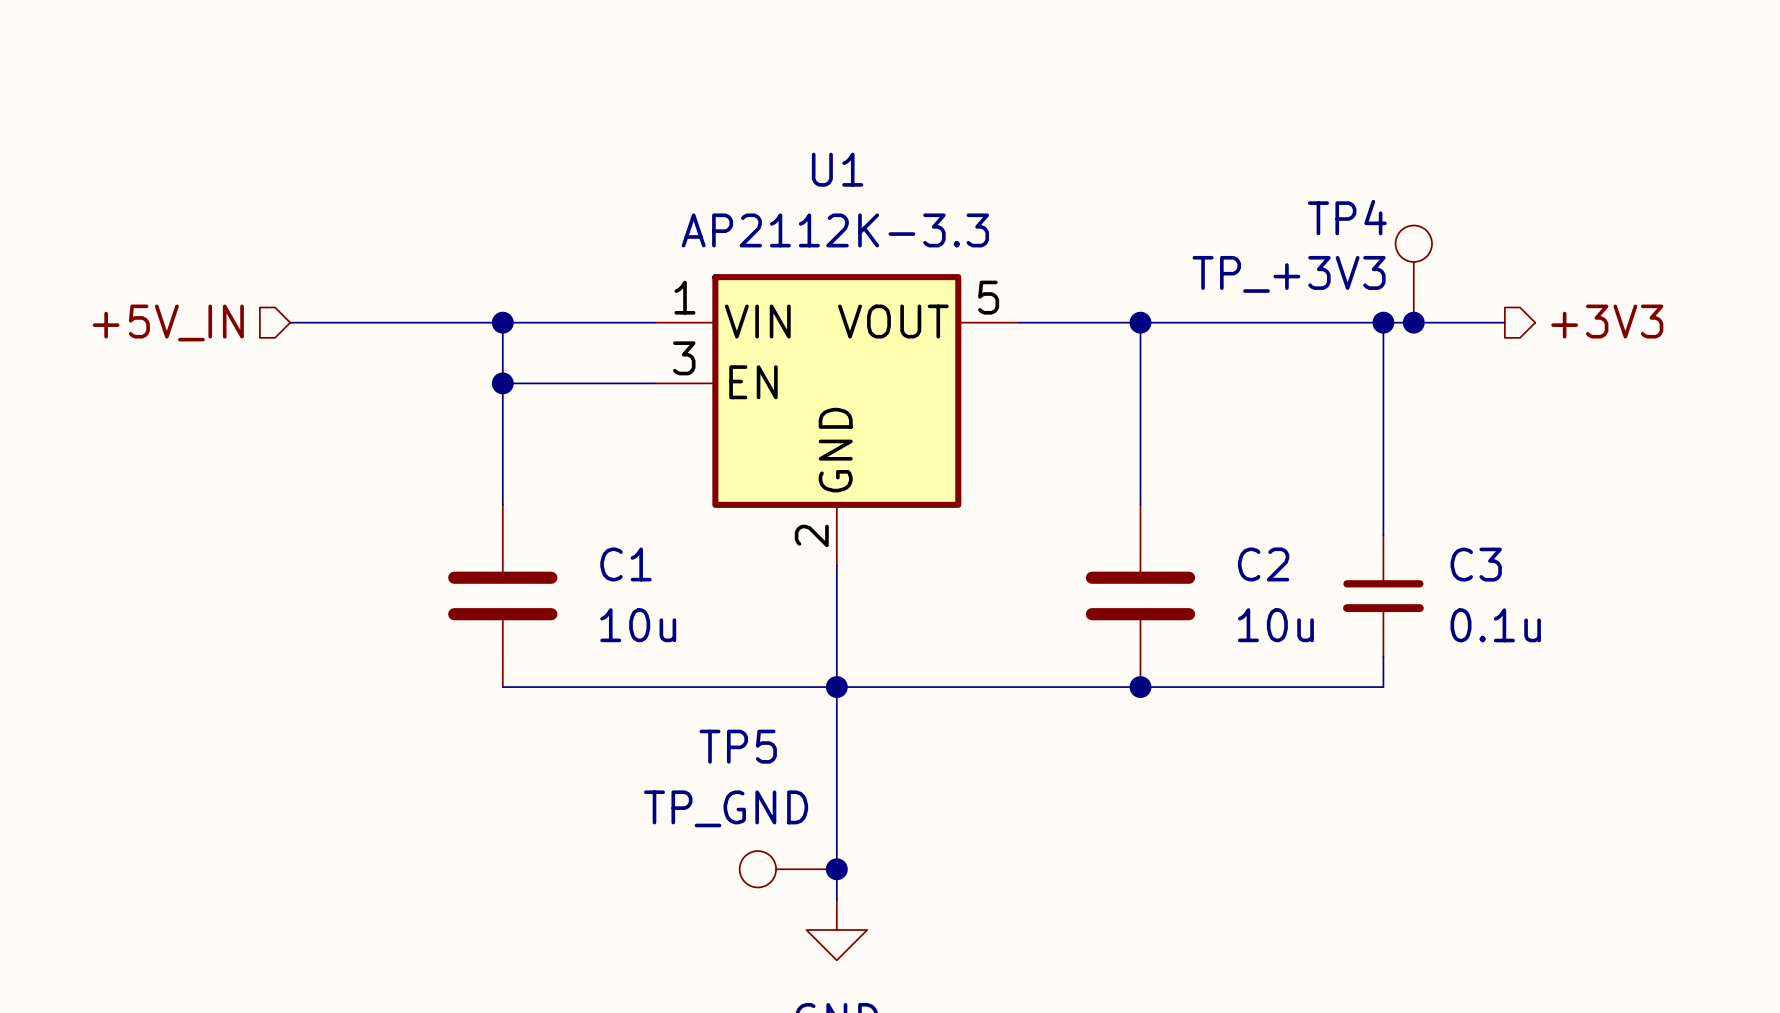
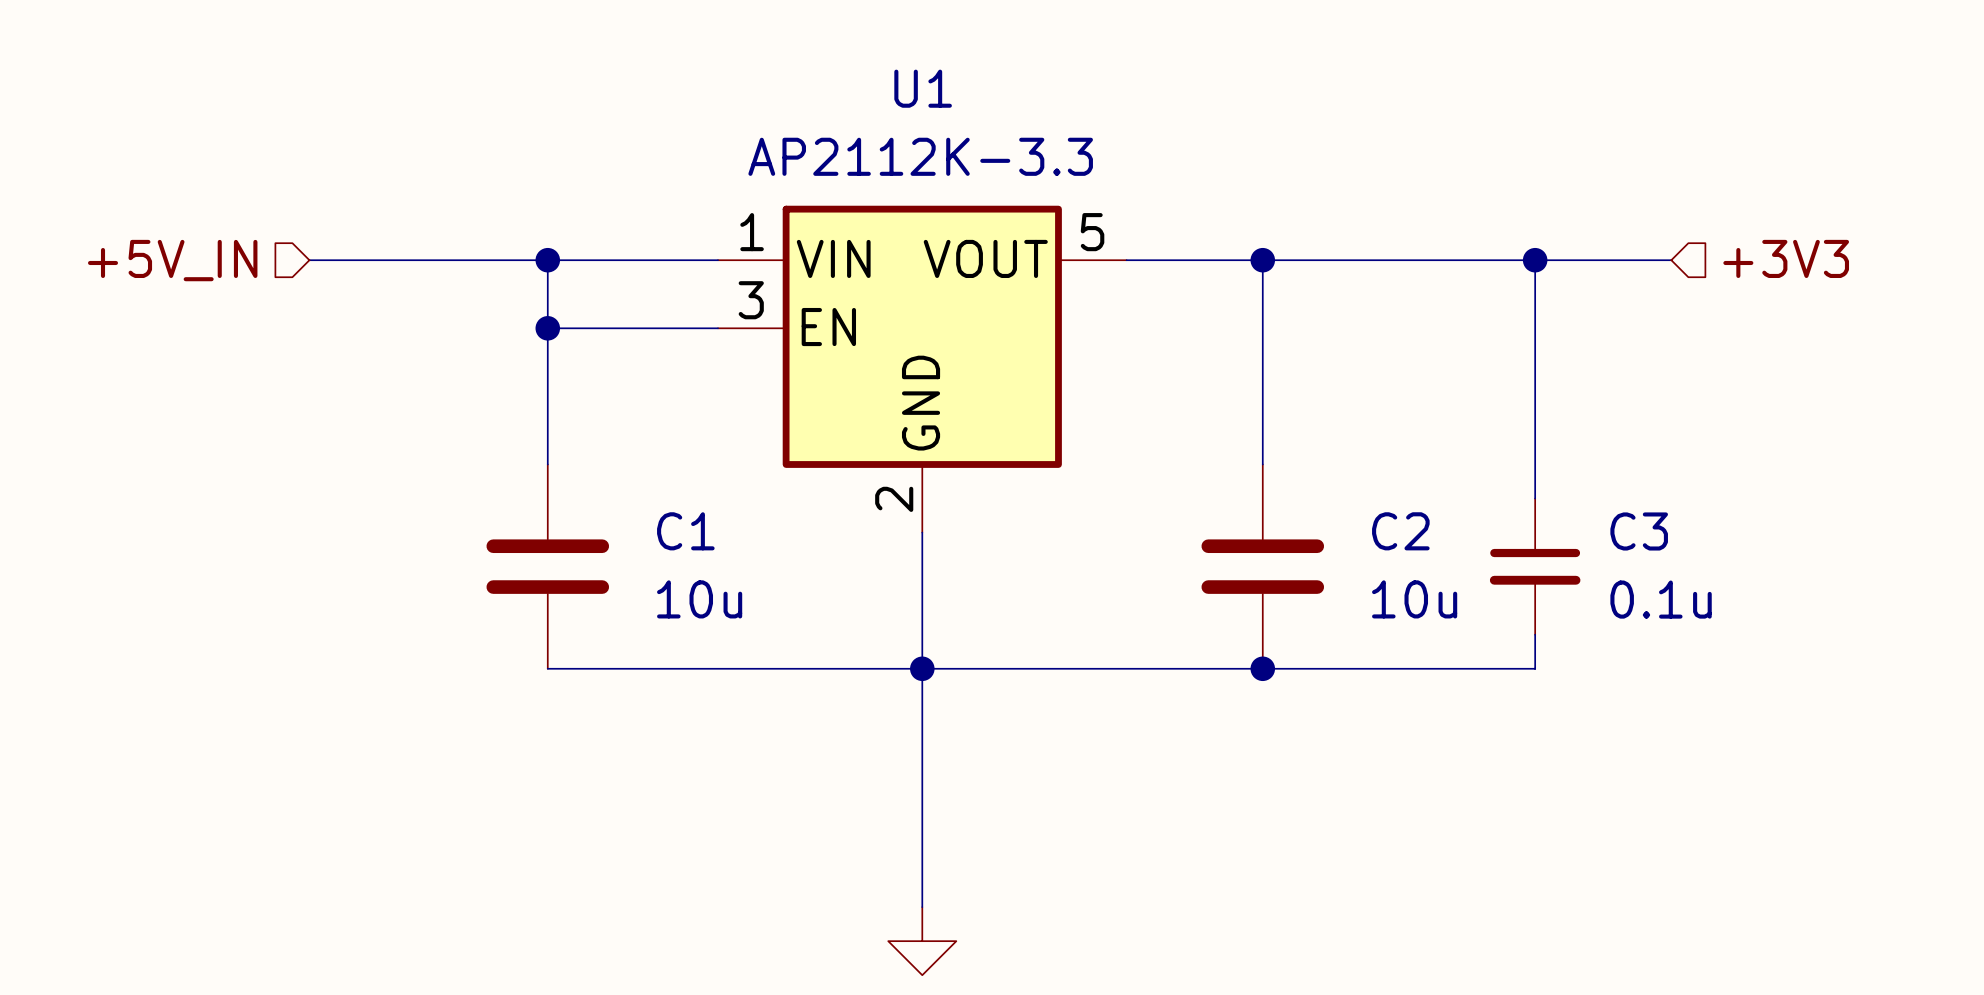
TP4: TP_+3V3 (1413, 274) -> none
hierarchical label shape: output (1607, 321) -> input (1786, 258)
junction: (1413, 322) -> none
TP5: TP_GND (788, 869) -> none
junction: (836, 869) -> none

